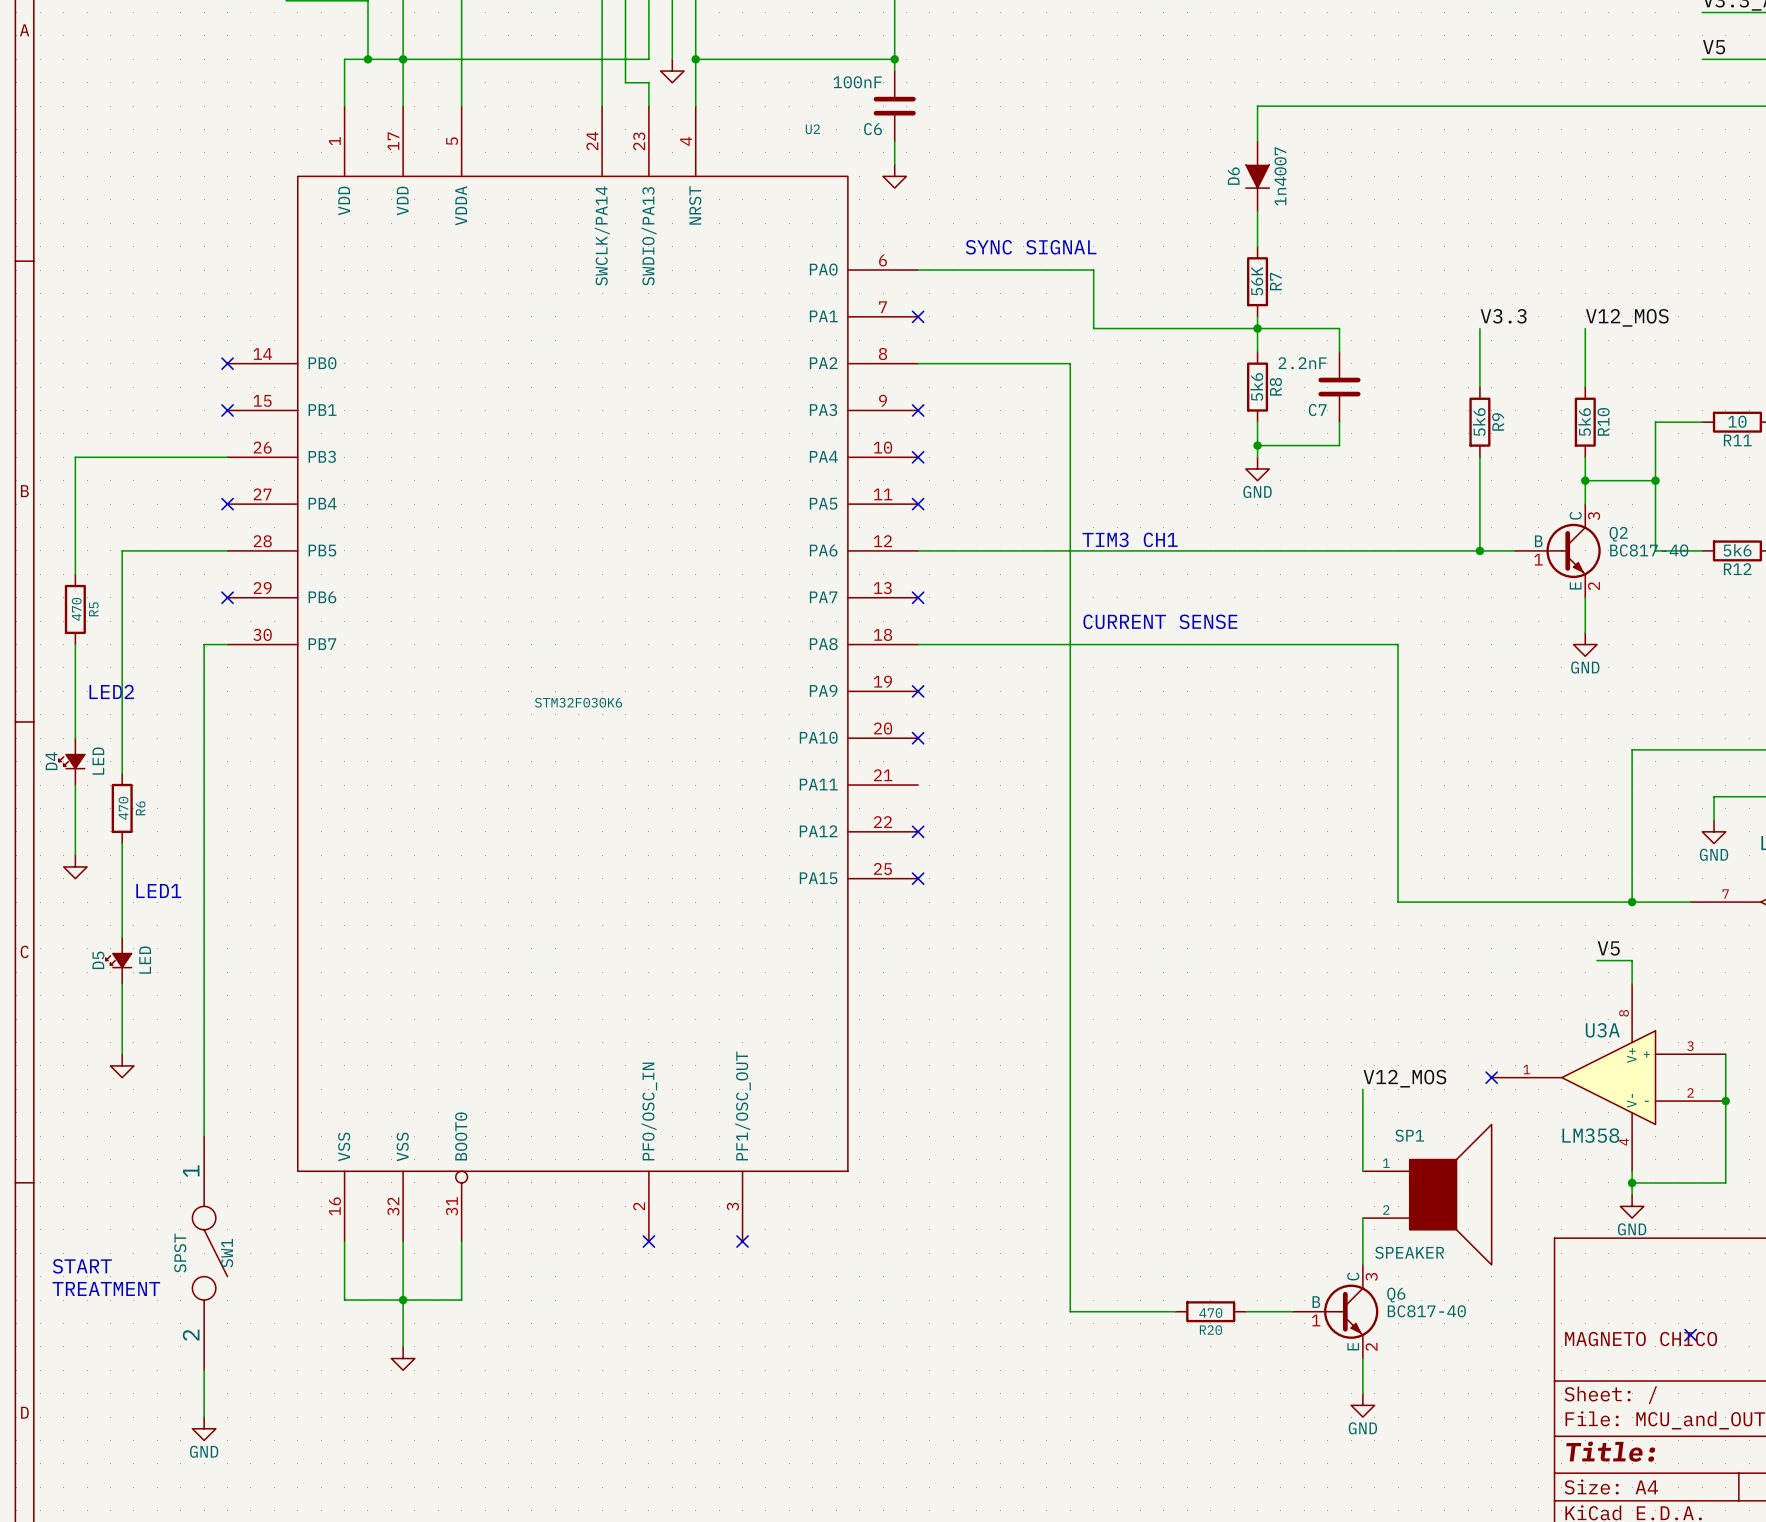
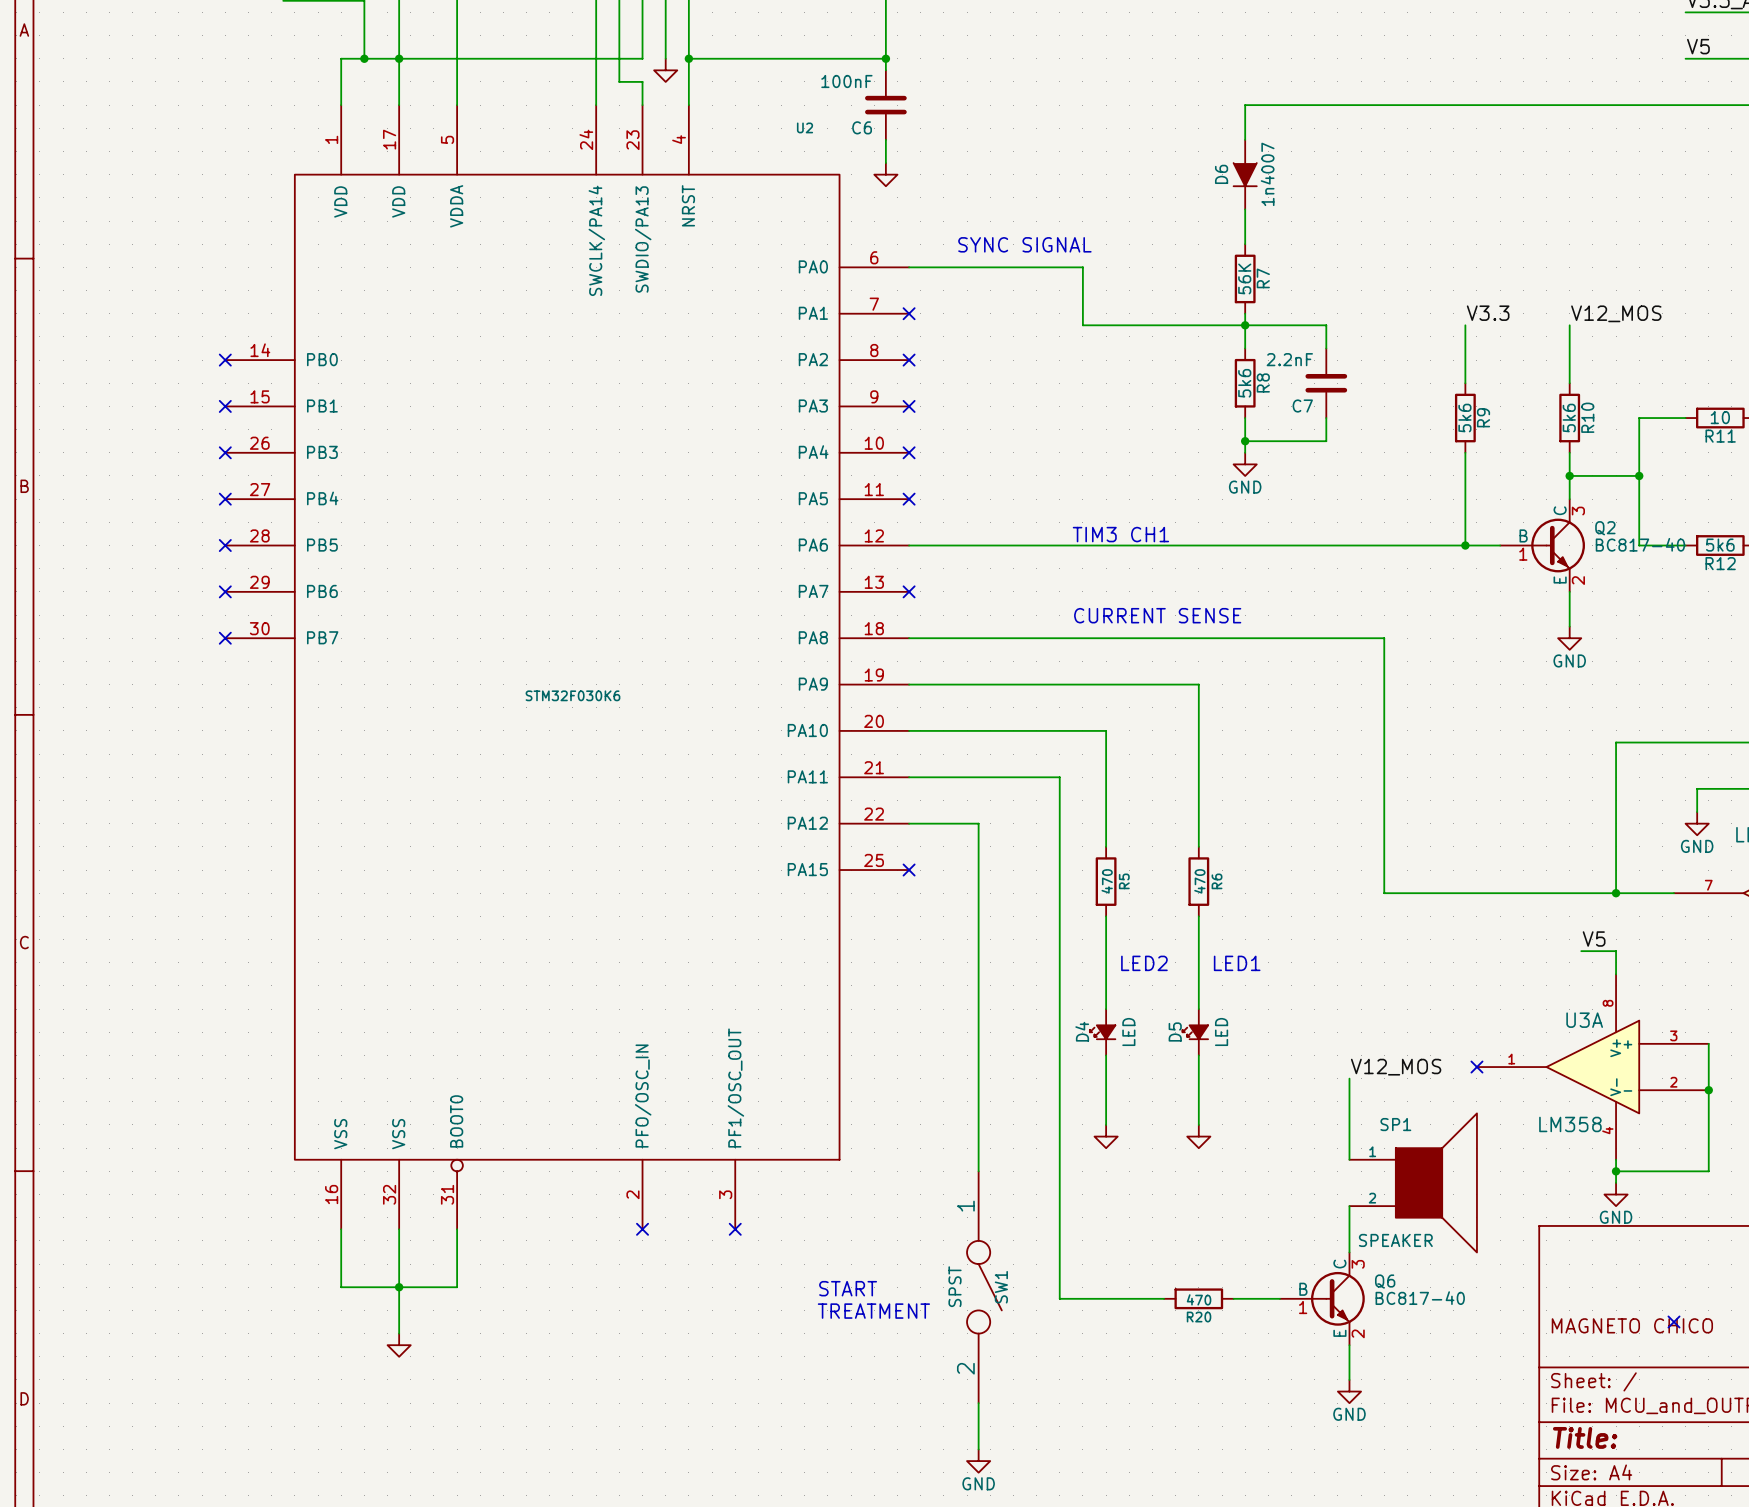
wire: (918, 363) (1070, 363) (1070, 785) -> (909, 777) (1059, 777)
no-connect mark: none -> (909, 360)
wire: (227, 457) (75, 457) (75, 574) -> none
no-connect mark: none -> (225, 452)
wire: (227, 550) (122, 550) (122, 773) -> none
no-connect mark: none -> (225, 545)
R5 position: (75, 609) -> (1106, 881)
wire: (75, 644) (75, 738) -> none
wire: (227, 644) (204, 644) (204, 1136) -> none
no-connect mark: none -> (225, 638)
text: LED2 (111, 691) -> none
wire: none -> (909, 684) (1198, 684) (1198, 846)
no-connect mark: (918, 691) -> none
wire: none -> (909, 730) (1106, 730) (1106, 846)
no-connect mark: (918, 738) -> none
D4 position: (71, 761) -> (1102, 1032)
wire: (75, 785) (75, 855) -> none
R6 position: (122, 808) -> (1198, 881)
wire: none -> (909, 823) (978, 823) (978, 1171)
no-connect mark: (918, 831) -> none
wire: (122, 843) (122, 937) -> none
power symbol: (75, 866) -> none
text: LED1 (158, 891) -> none
wire: none -> (1106, 916) (1106, 1009)
wire: none -> (1198, 916) (1198, 1009)
D5 position: (118, 960) -> (1195, 1032)
text: none -> LED2 (1144, 963)
text: none -> LED1 (1237, 963)
wire: (122, 984) (122, 1054) -> none
power symbol: (122, 1065) -> none
wire: none -> (1106, 1055) (1106, 1124)
wire: none -> (1198, 1055) (1198, 1124)
power symbol: none -> (1106, 1136)
power symbol: none -> (1198, 1136)
SW1 position: (209, 1253) -> (984, 1287)
text: START (82, 1266) -> none
text: TREATMENT (106, 1288) -> none
text: none -> START (848, 1288)
text: none -> TREATMENT (873, 1311)
wire: (204, 1370) (204, 1417) -> none
wire: none -> (978, 1403) (978, 1449)
power symbol: GND (204, 1428) -> none
power symbol: none -> GND (978, 1461)

